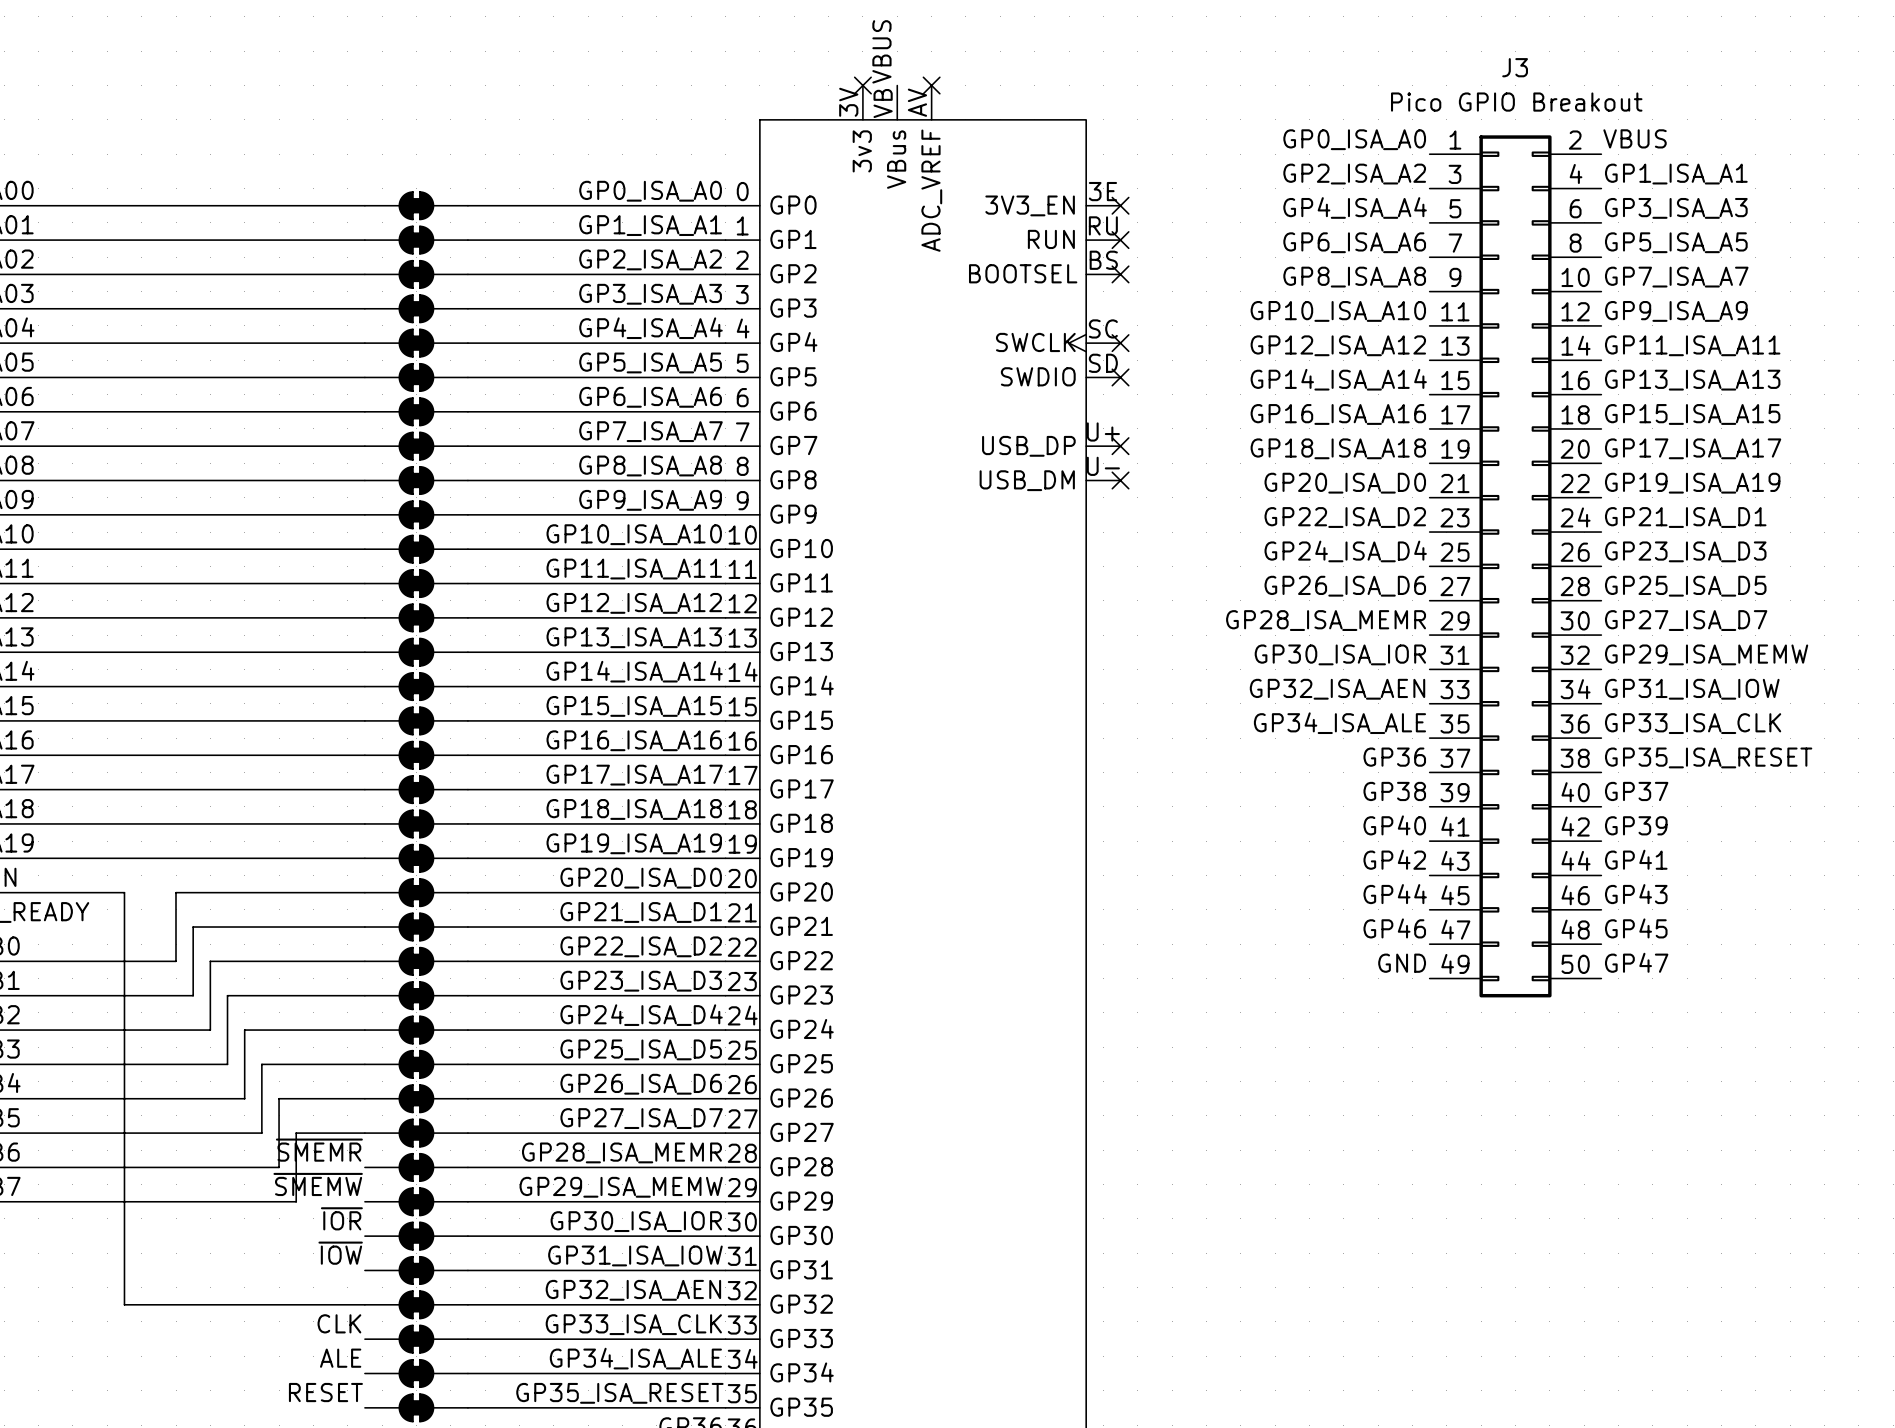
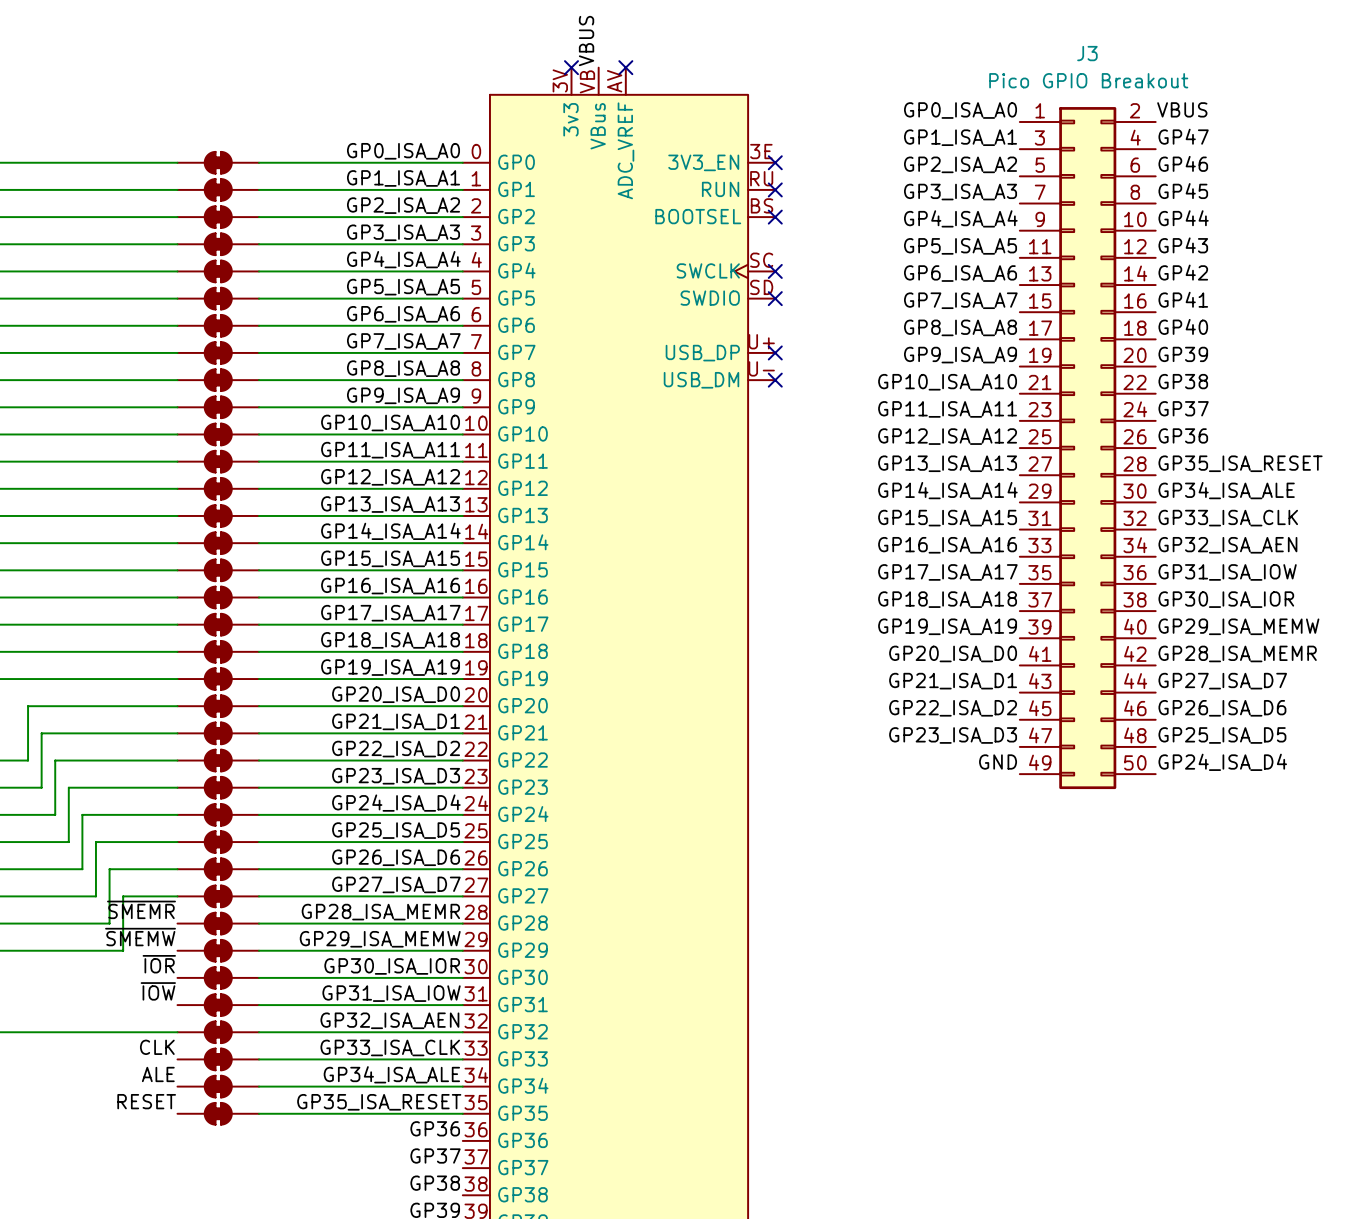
label: GP2_ISA_A2 (1354, 174) -> GP1_ISA_A1 (960, 137)
label: GP1_ISA_A1 (1676, 174) -> GP47 (1183, 136)
label: GP4_ISA_A4 (1355, 207) -> GP2_ISA_A2 (960, 164)
label: GP3_ISA_A3 (1676, 208) -> GP46 (1183, 163)
label: GP6_ISA_A6 (1354, 242) -> GP3_ISA_A3 (960, 192)
label: GP5_ISA_A5 (1676, 242) -> GP45 (1183, 191)
label: GP8_ISA_A8 (1354, 277) -> GP4_ISA_A4 (960, 218)
label: GP7_ISA_A7 (1676, 277) -> GP44 (1183, 218)
label: GP10_ISA_A10 (1338, 311) -> GP5_ISA_A5 (960, 246)
label: GP9_ISA_A9 (1676, 311) -> GP43 (1183, 245)
label: GP12_ISA_A12 (1338, 345) -> GP6_ISA_A6 (960, 273)
label: GP11_ISA_A11 (1692, 345) -> GP42 (1183, 272)
label: GP14_ISA_A14 (1338, 379) -> GP7_ISA_A7 (960, 300)
label: GP13_ISA_A13 (1692, 380) -> GP41 (1183, 299)
label: GP16_ISA_A16 (1338, 414) -> GP8_ISA_A8 (960, 327)
label: GP15_ISA_A15 (1692, 414) -> GP40 (1183, 326)
label: GP18_ISA_A18 (1338, 448) -> GP9_ISA_A9 (960, 355)
label: GP17_ISA_A17 (1693, 448) -> GP39 (1183, 354)
label: GP20_ISA_D0 (1345, 483) -> GP10_ISA_A10 (947, 382)
label: GP19_ISA_A19 (1692, 483) -> GP38 (1183, 381)
label: GP22_ISA_D2 (1345, 517) -> GP11_ISA_A11 (947, 409)
label: GP21_ISA_D1 (1685, 517) -> GP37 (1183, 408)
label: GP24_ISA_D4 (1345, 551) -> GP12_ISA_A12 (947, 436)
label: GP23_ISA_D3 (1685, 551) -> GP36 (1183, 435)
label: GP26_ISA_D6 (1345, 586) -> GP13_ISA_A13 (947, 463)
label: GP25_ISA_D5 (1685, 586) -> GP35_ISA_RESET (1240, 463)
label: GP28_ISA_MEMR (1326, 620) -> GP14_ISA_A14 (947, 490)
label: GP27_ISA_D7 (1686, 620) -> GP34_ISA_ALE (1226, 490)
label: GP30_ISA_IOR (1340, 654) -> GP15_ISA_A15 (947, 518)
label: GP29_ISA_MEMW (1706, 654) -> GP33_ISA_CLK (1228, 518)
label: GP32_ISA_AEN (1337, 689) -> GP16_ISA_A16 (947, 545)
label: GP31_ISA_IOW (1692, 689) -> GP32_ISA_AEN (1227, 545)
label: GP34_ISA_ALE (1339, 723) -> GP17_ISA_A17 (947, 572)
label: GP33_ISA_CLK (1693, 723) -> GP31_ISA_IOW (1227, 572)
label: GP36 (1394, 757) -> GP18_ISA_A18 (947, 599)
label: GP35_ISA_RESET (1708, 757) -> GP30_ISA_IOR (1226, 599)
label: GP38 (1394, 791) -> GP19_ISA_A19 (947, 626)
label: GP37 (1636, 791) -> GP29_ISA_MEMW (1238, 626)
label: GP40 (1394, 825) -> GP20_ISA_D0 (953, 653)
label: GP39 (1636, 825) -> GP28_ISA_MEMR (1237, 653)
label: GP42 (1394, 859) -> GP21_ISA_D1 (953, 681)
label: GP41 (1636, 859) -> GP27_ISA_D7 (1222, 681)
label: GP44 (1395, 894) -> GP22_ISA_D2 (953, 708)
label: GP43 (1636, 894) -> GP26_ISA_D6 (1222, 708)
label: GP46 (1394, 928) -> GP23_ISA_D3 (953, 735)
label: GP45 (1636, 928) -> GP25_ISA_D5 (1222, 735)
label: GP47 (1636, 962) -> GP24_ISA_D4 (1222, 762)

